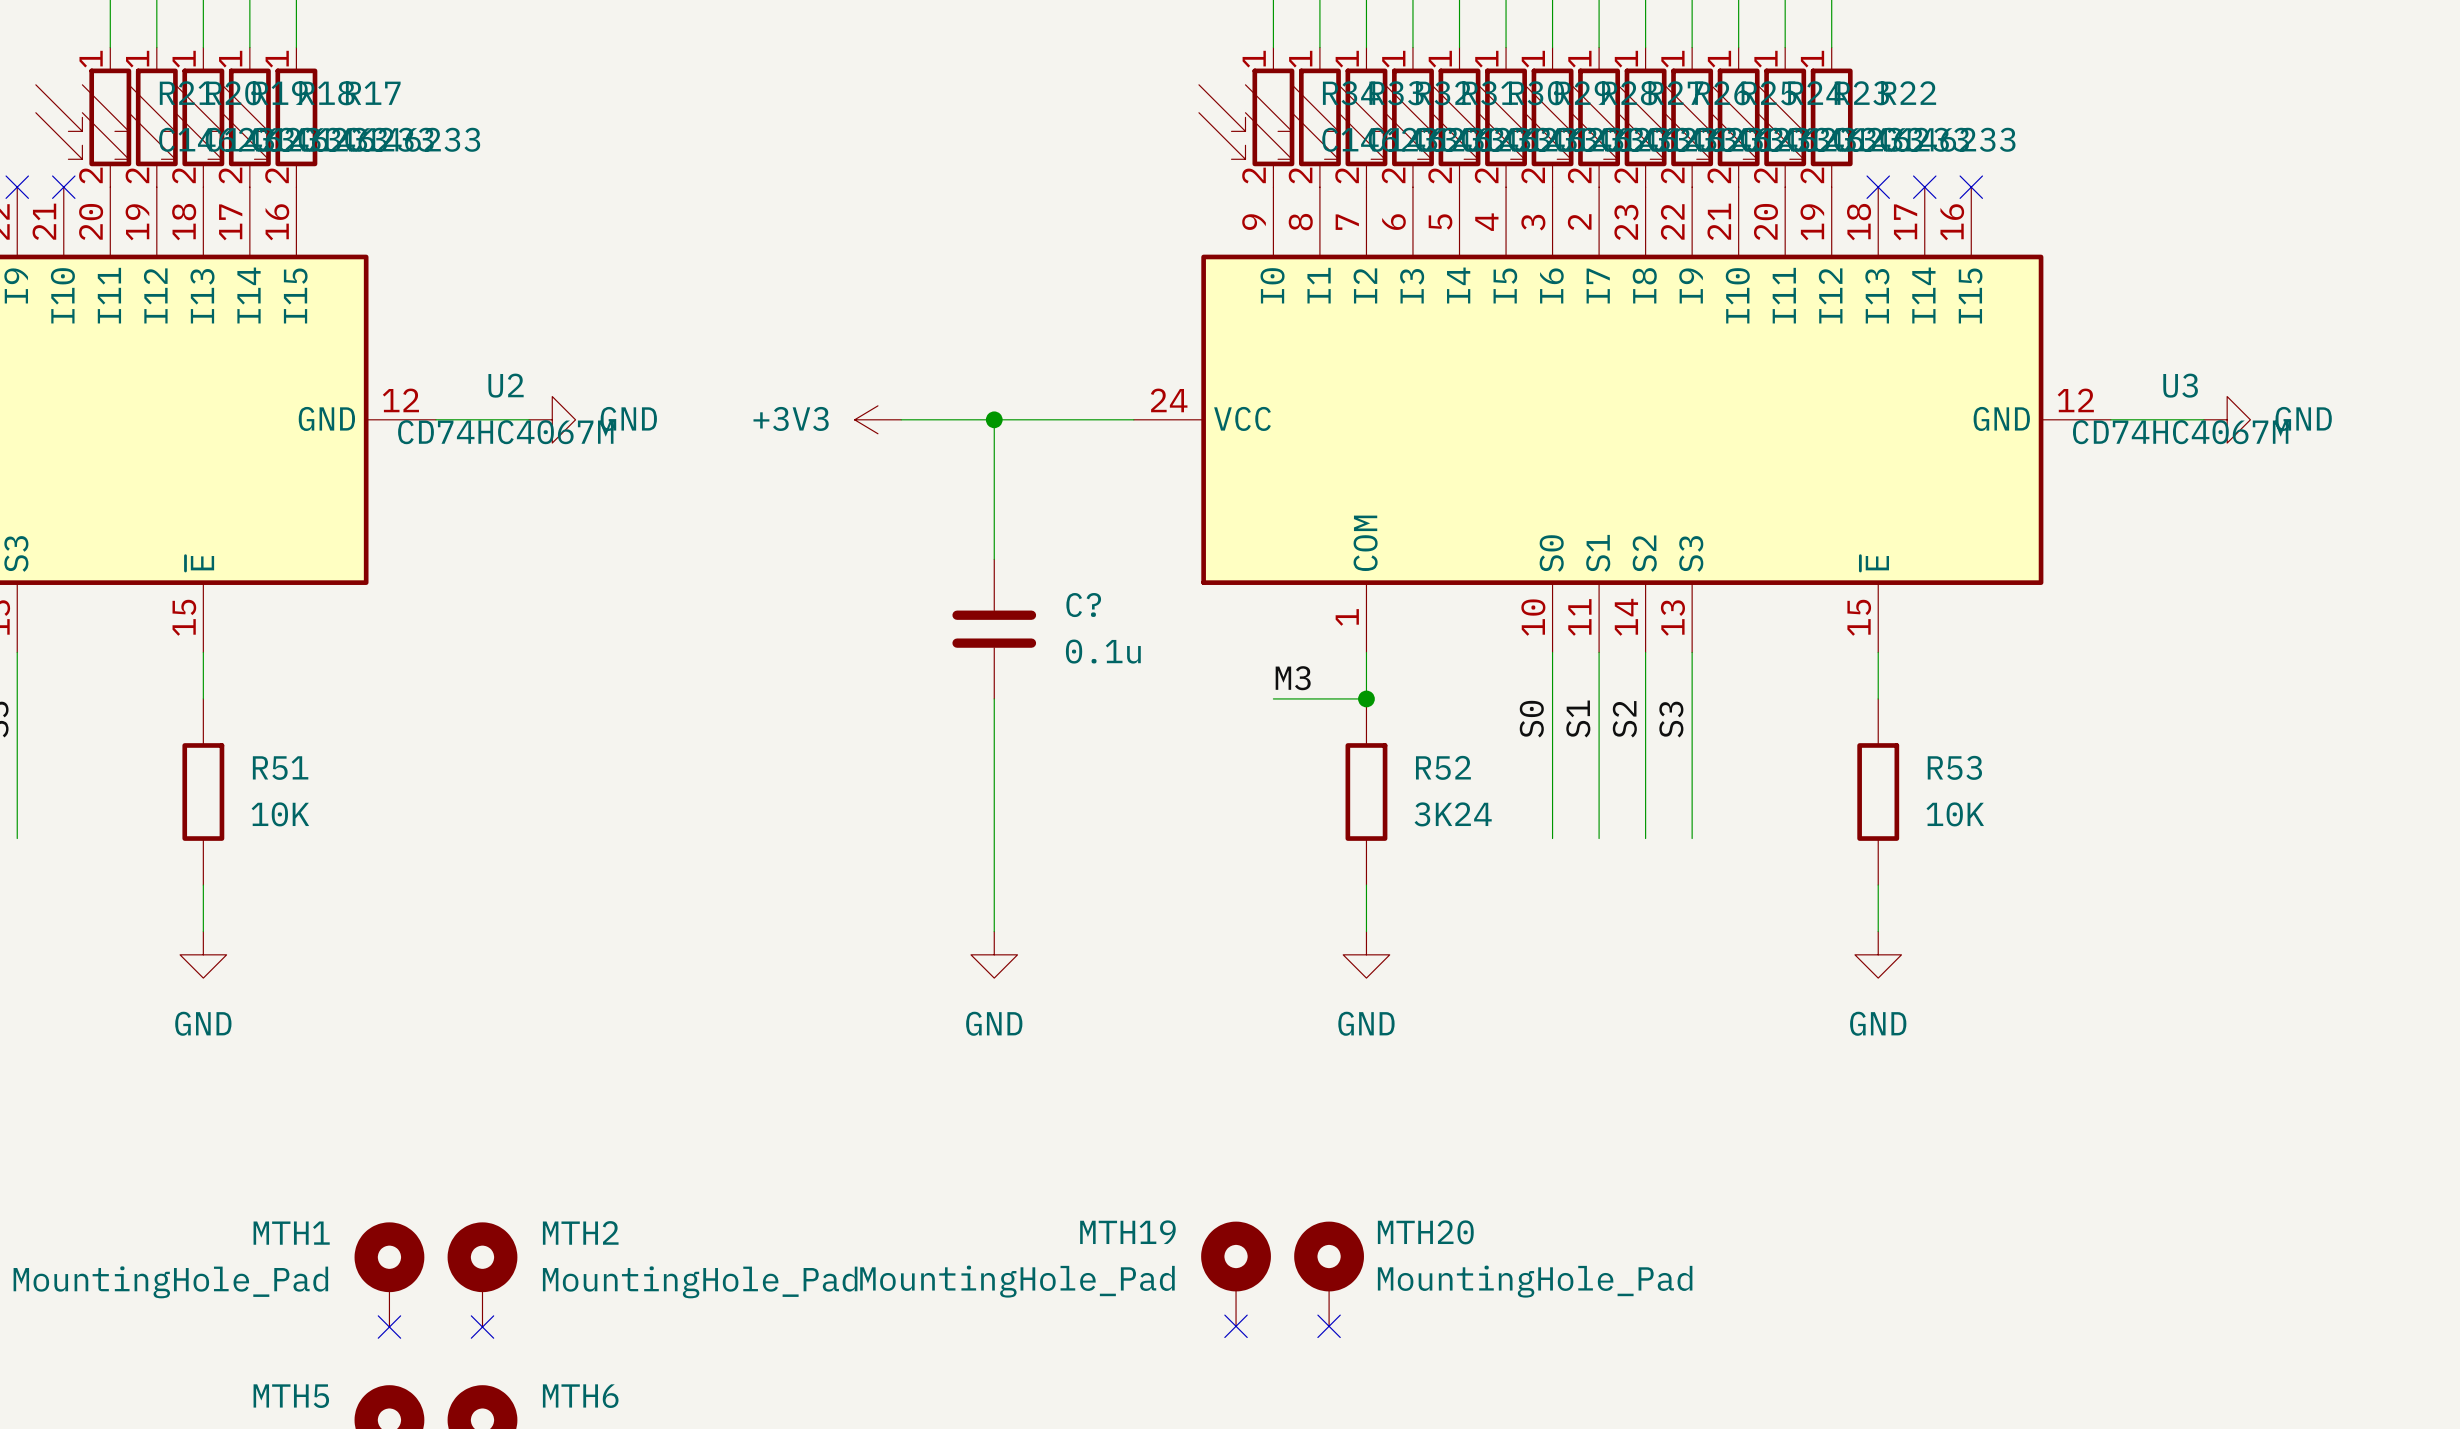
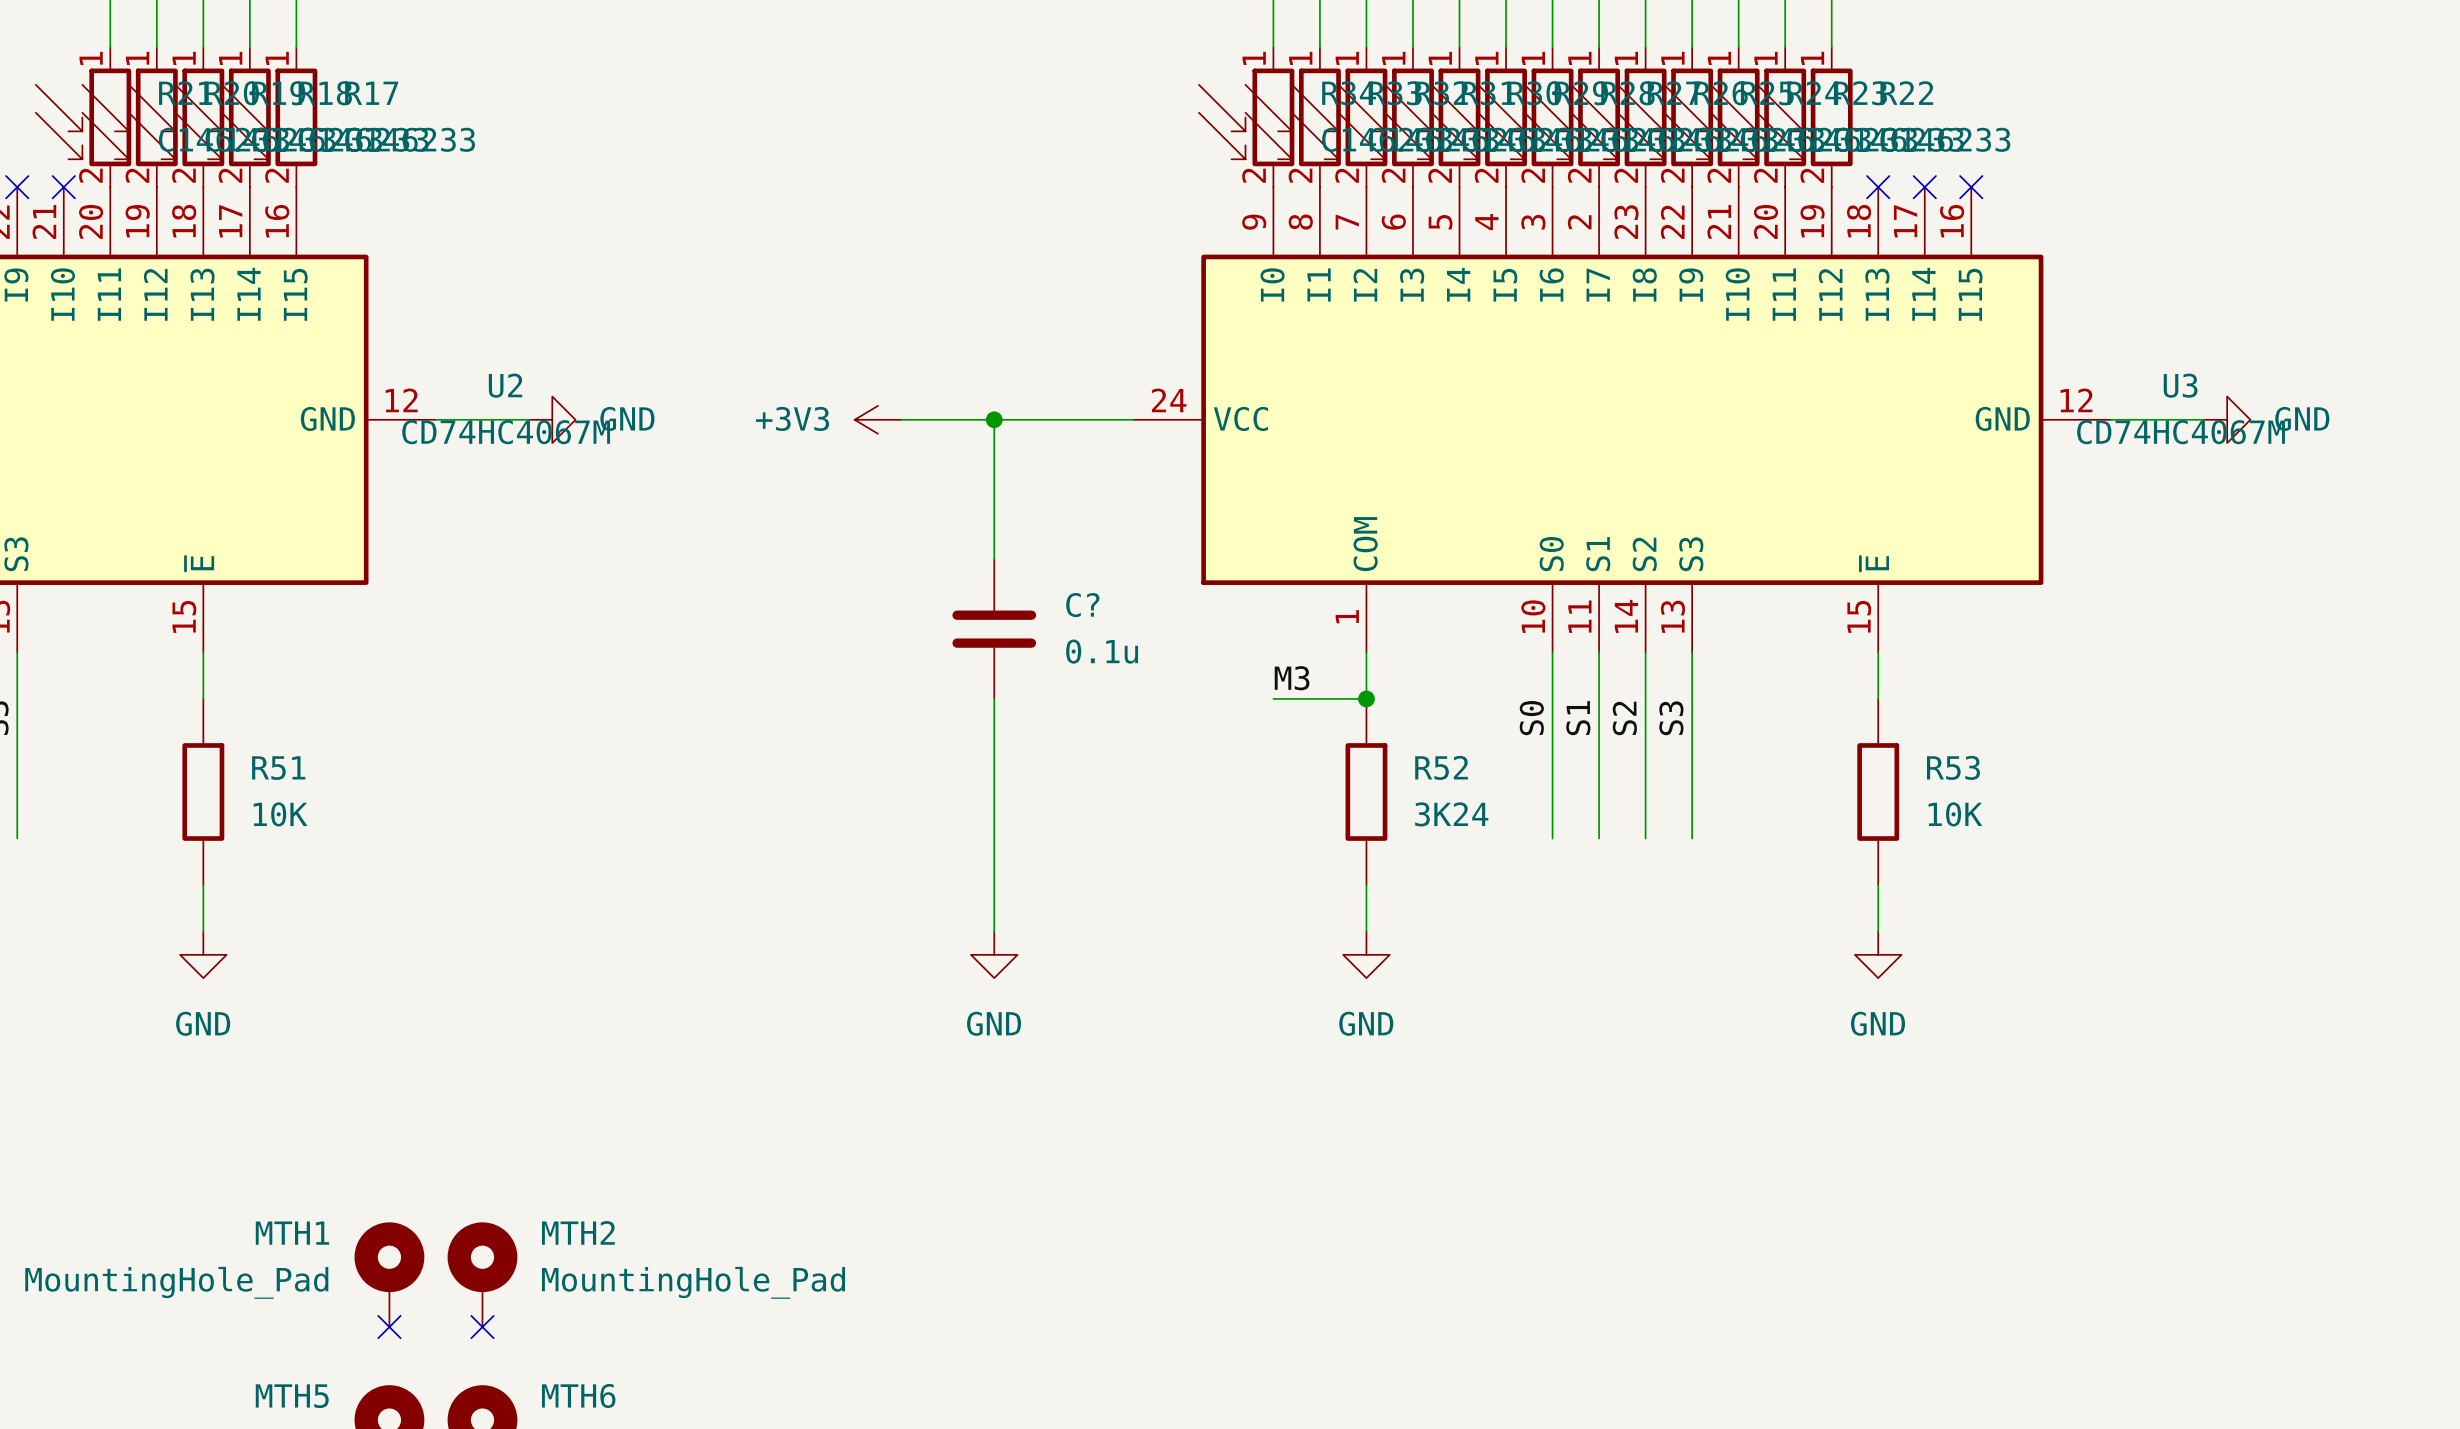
MTH19: MountingHole_Pad (1236, 1273) -> none
MTH20: MountingHole_Pad (1329, 1273) -> none
no-connect mark: (1236, 1326) -> none
no-connect mark: (1329, 1326) -> none

